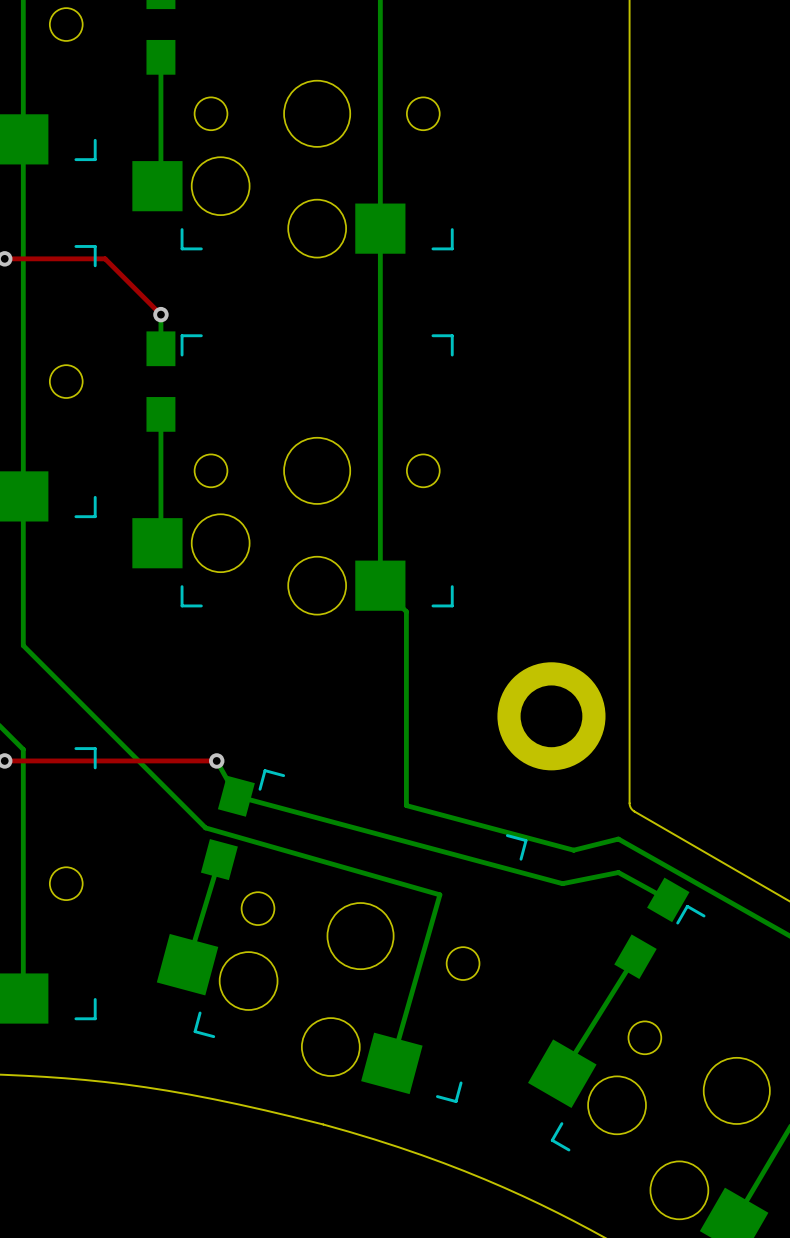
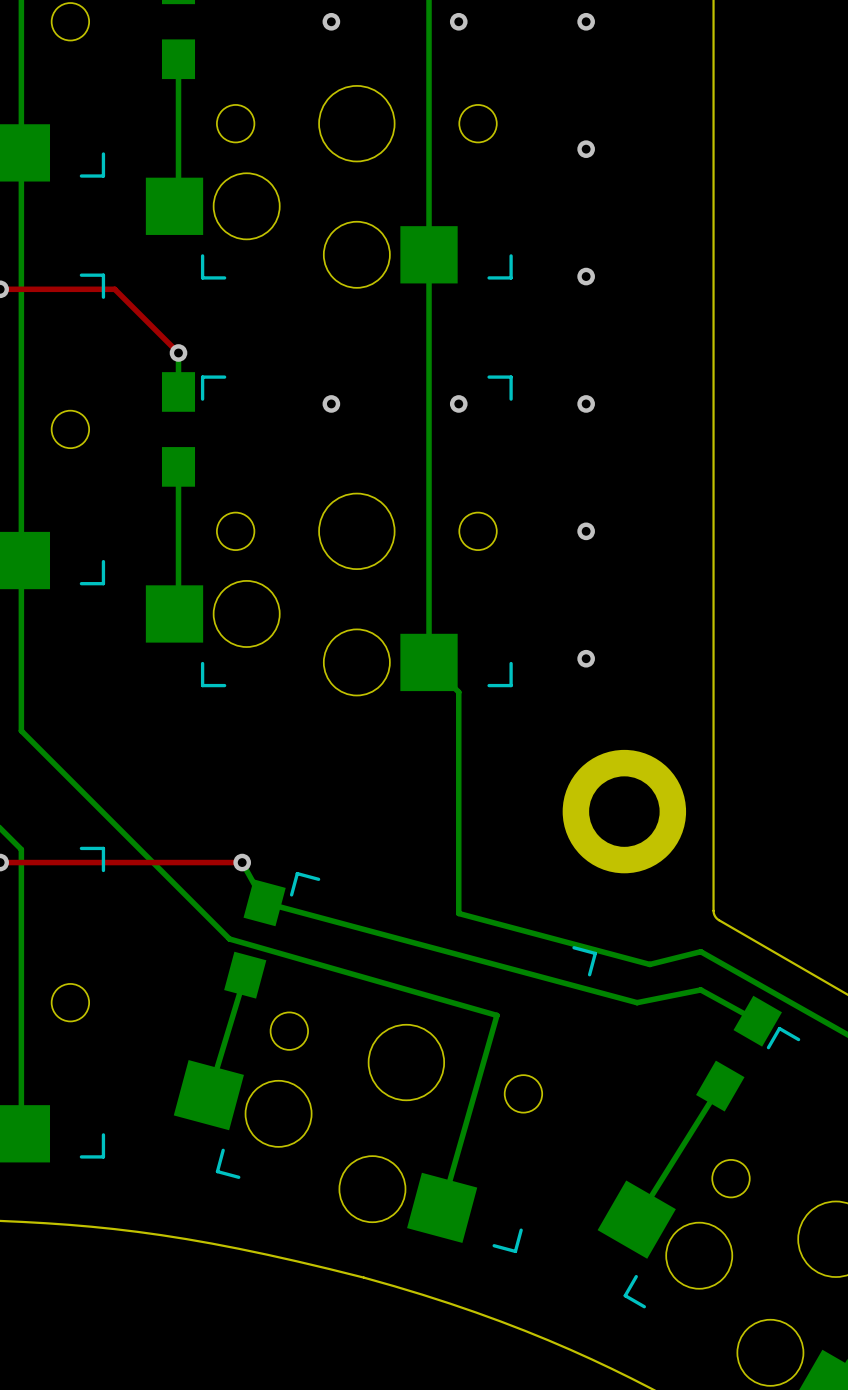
via: none -> (331, 21)
via: none -> (458, 21)
via: none -> (586, 21)
via: none -> (586, 149)
via: none -> (586, 276)
via: none -> (331, 403)
via: none -> (458, 403)
via: none -> (586, 403)
via: none -> (586, 531)
via: none -> (586, 658)

